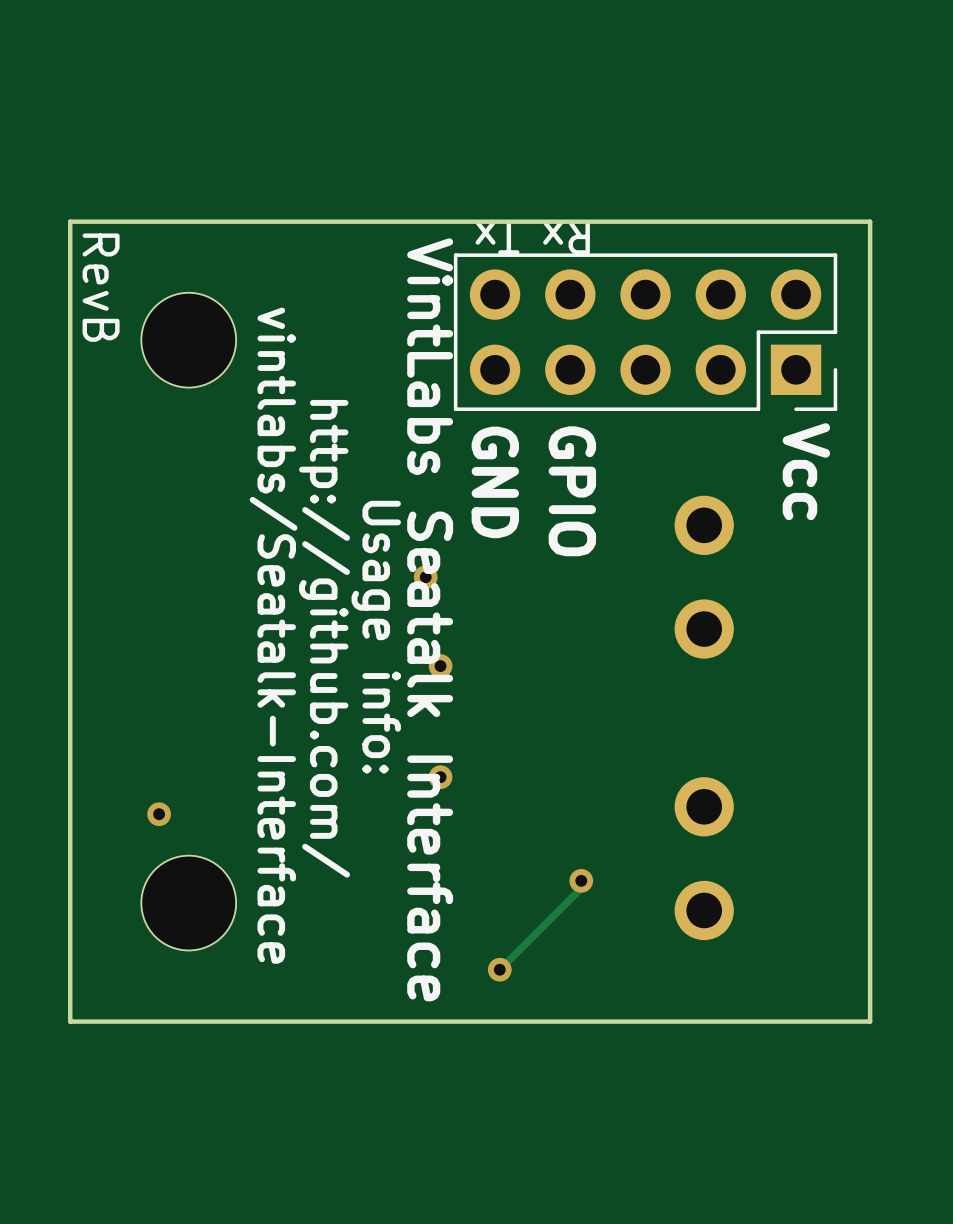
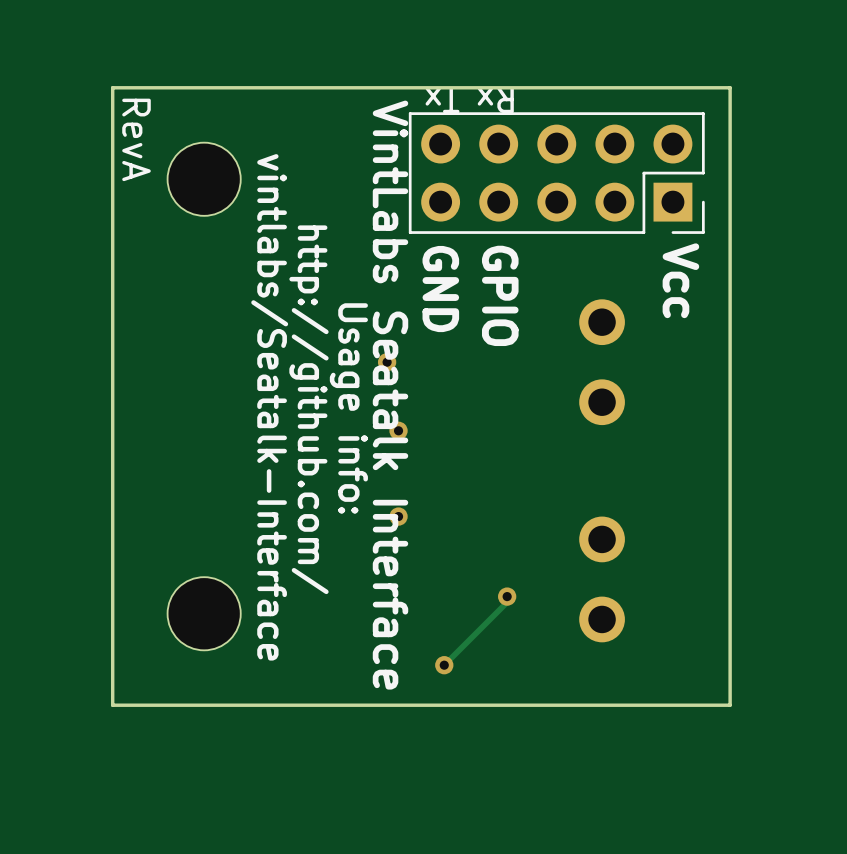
text: RevB (101, 287) -> RevA (136, 139)
via: (159, 814) -> none

